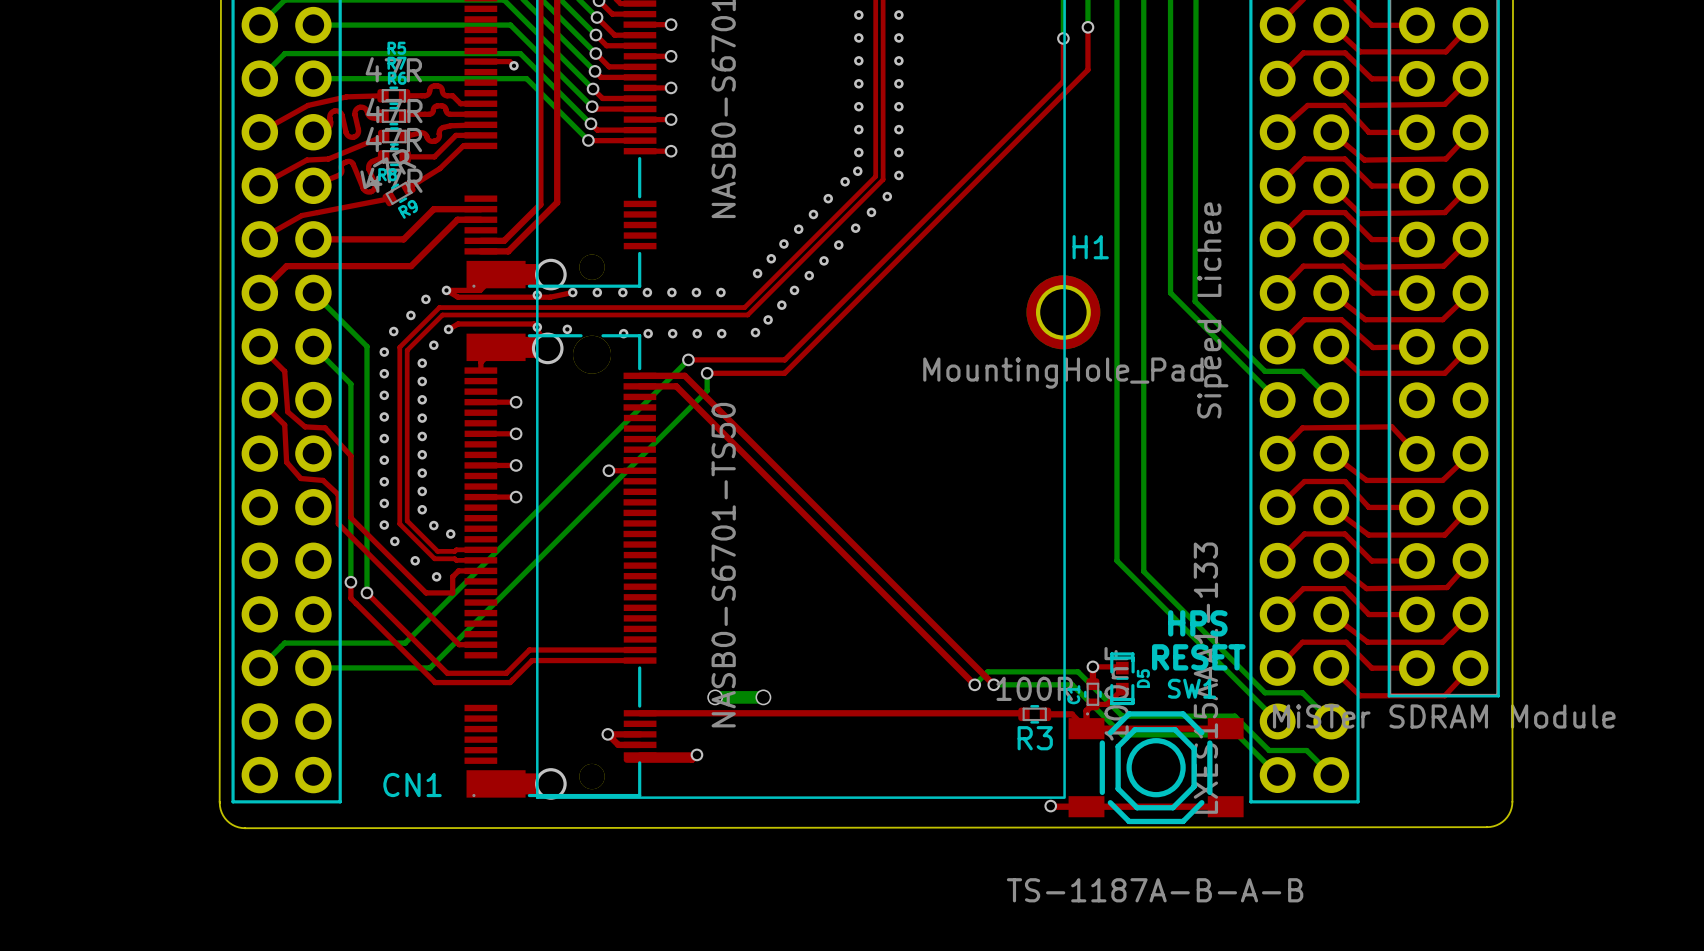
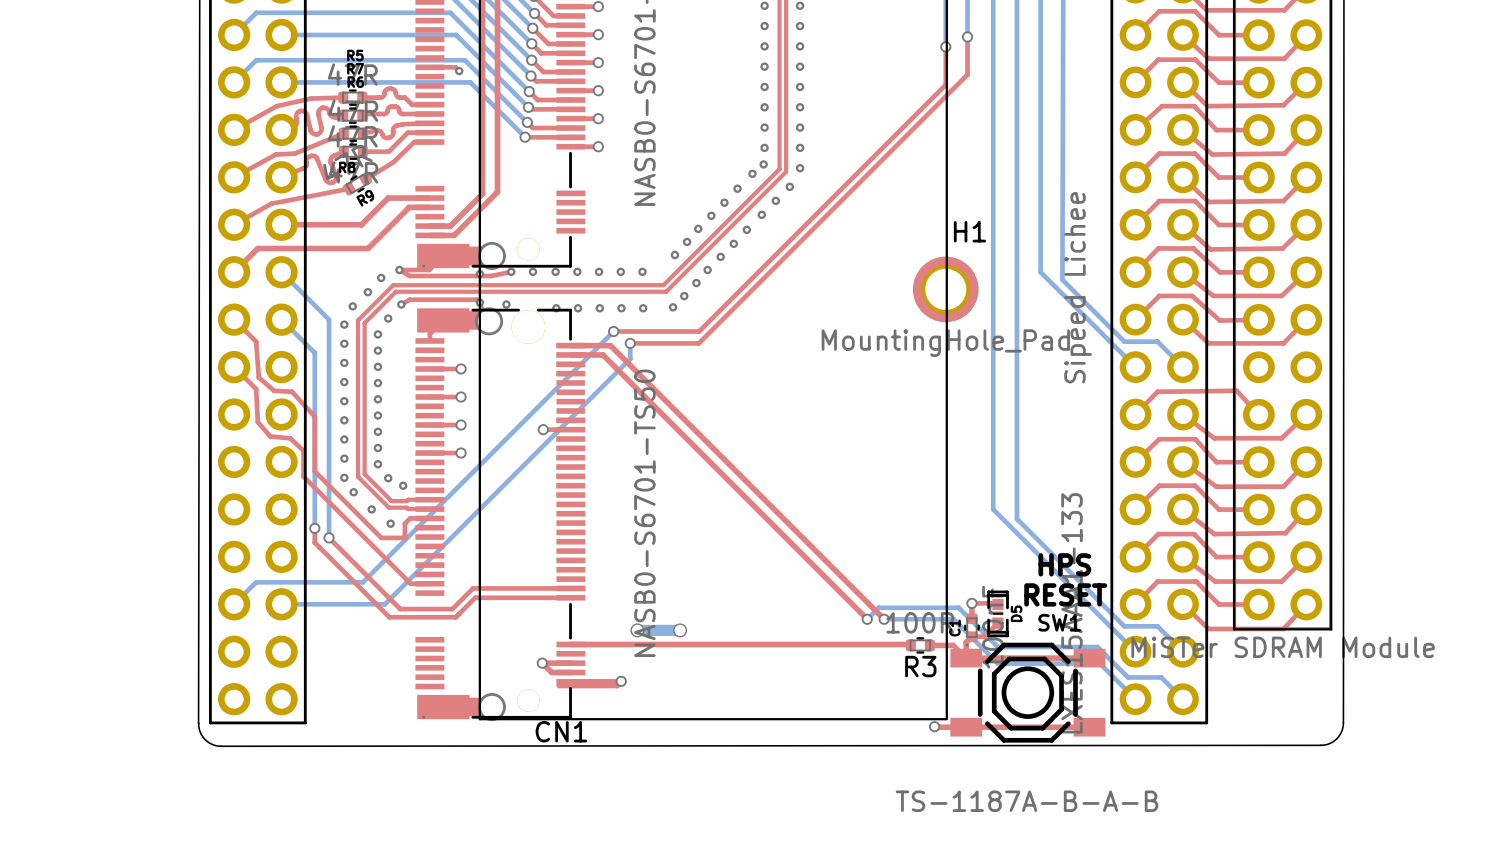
CN1 name position: CN1 (412, 784) -> CN1 (561, 731)

